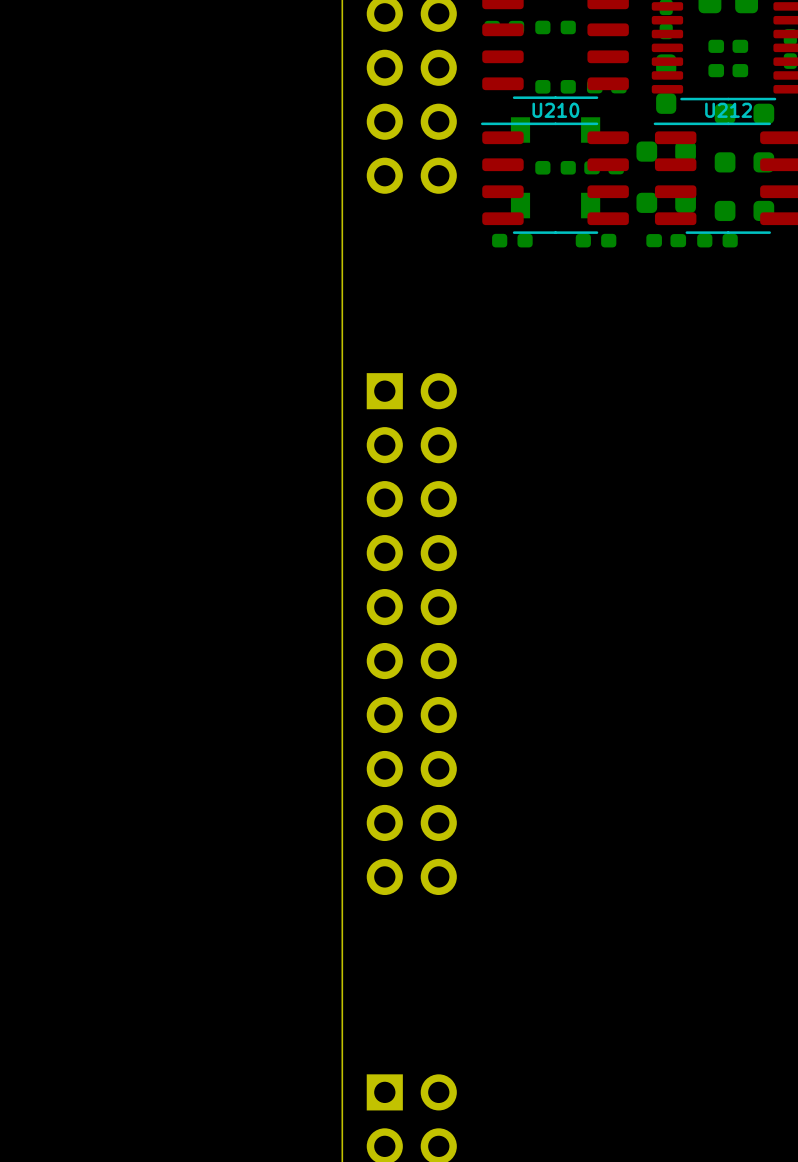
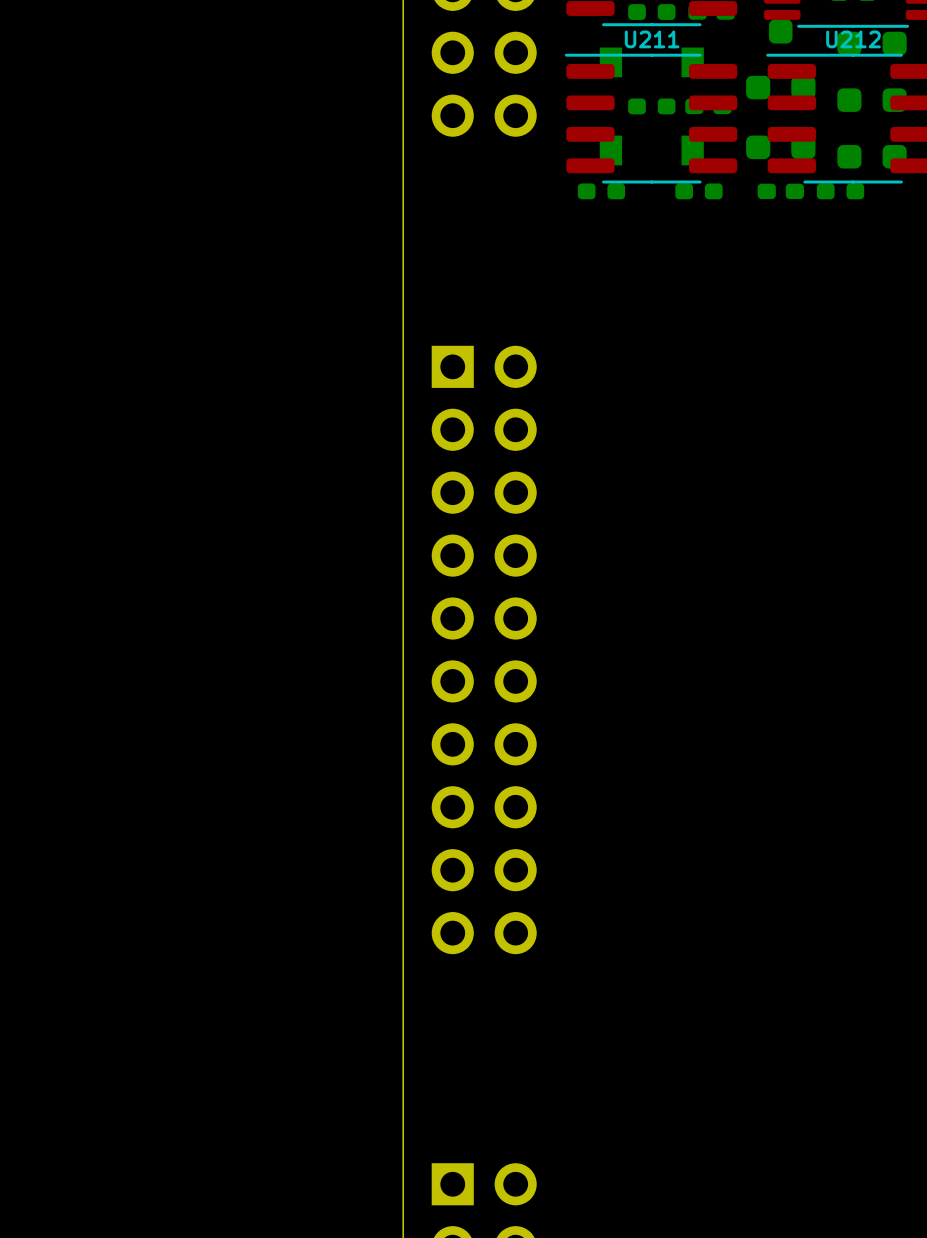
U210 name: U210 (555, 110) -> U211 (652, 39)

